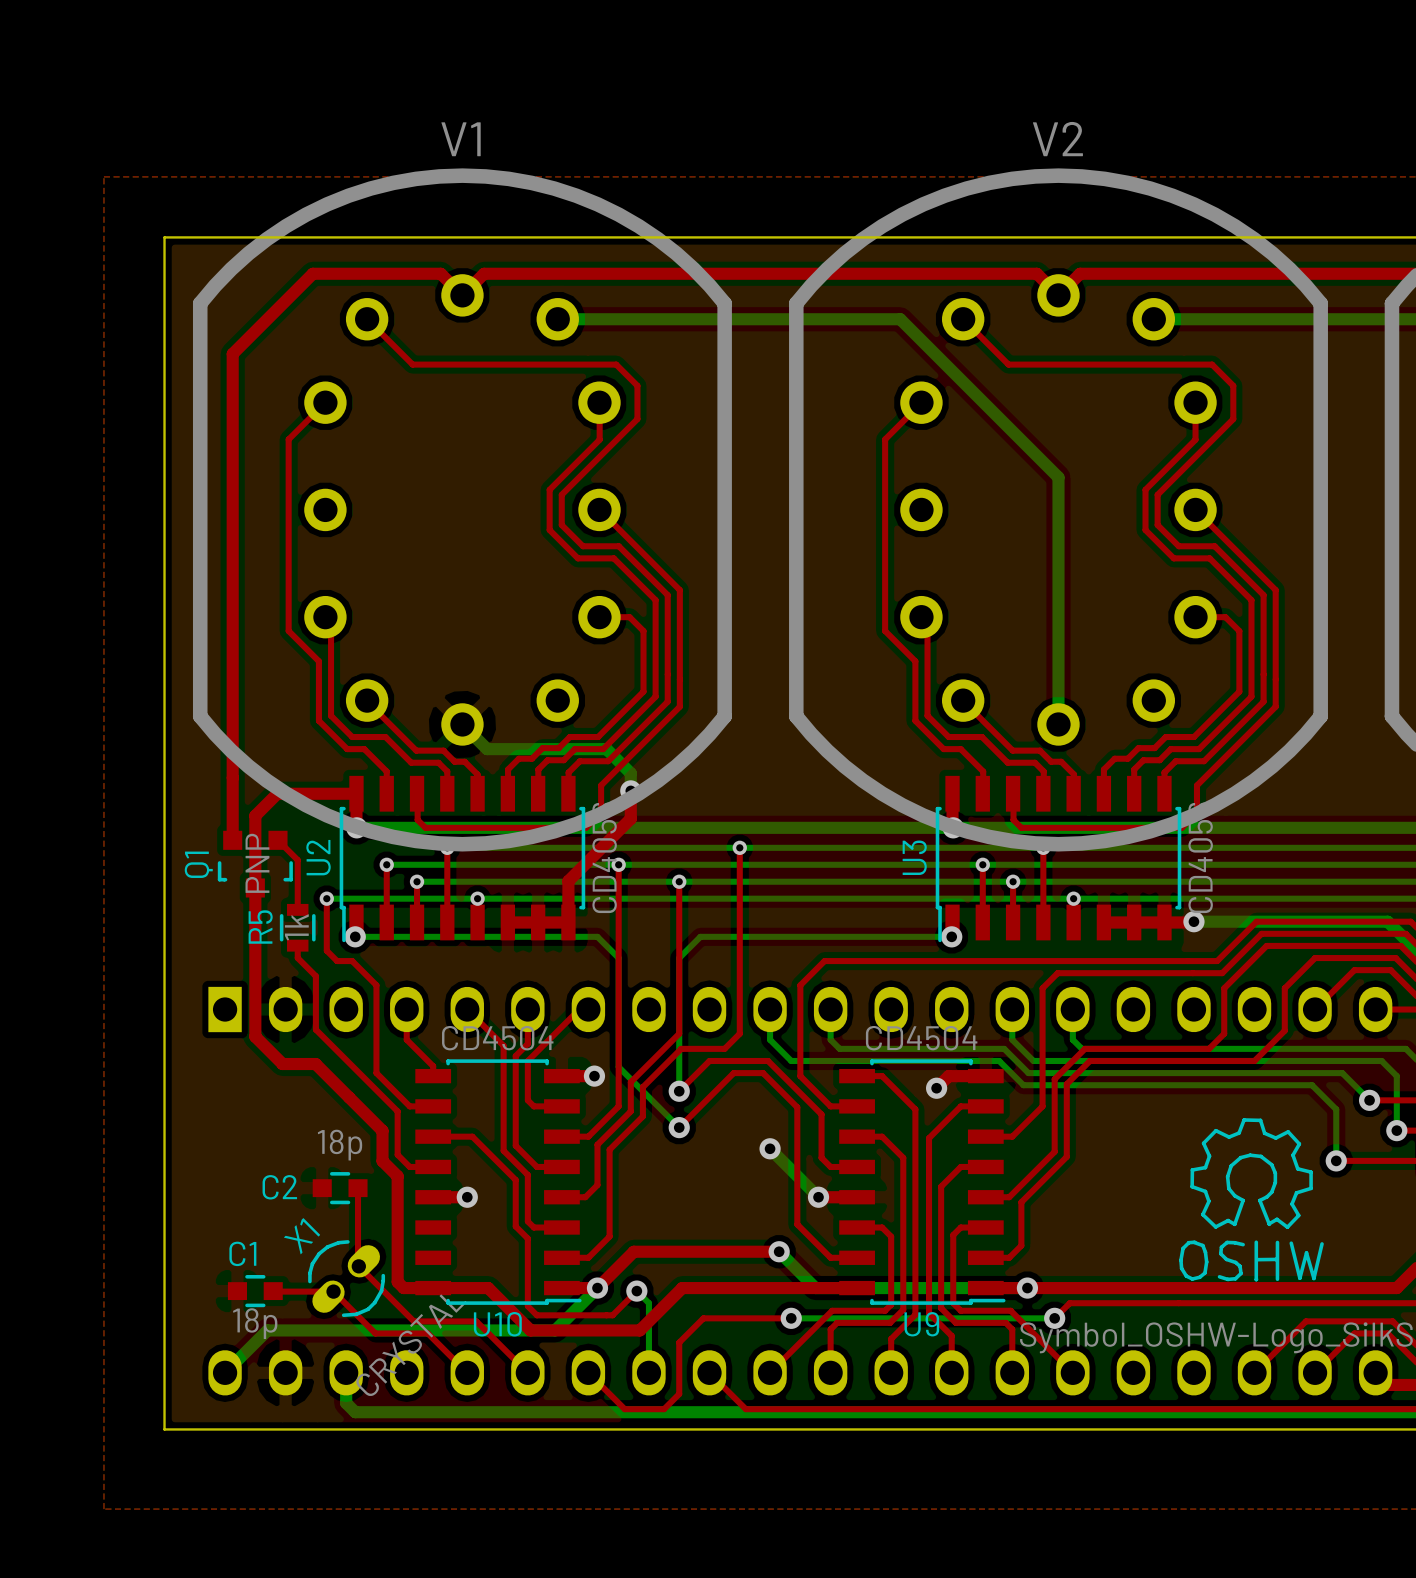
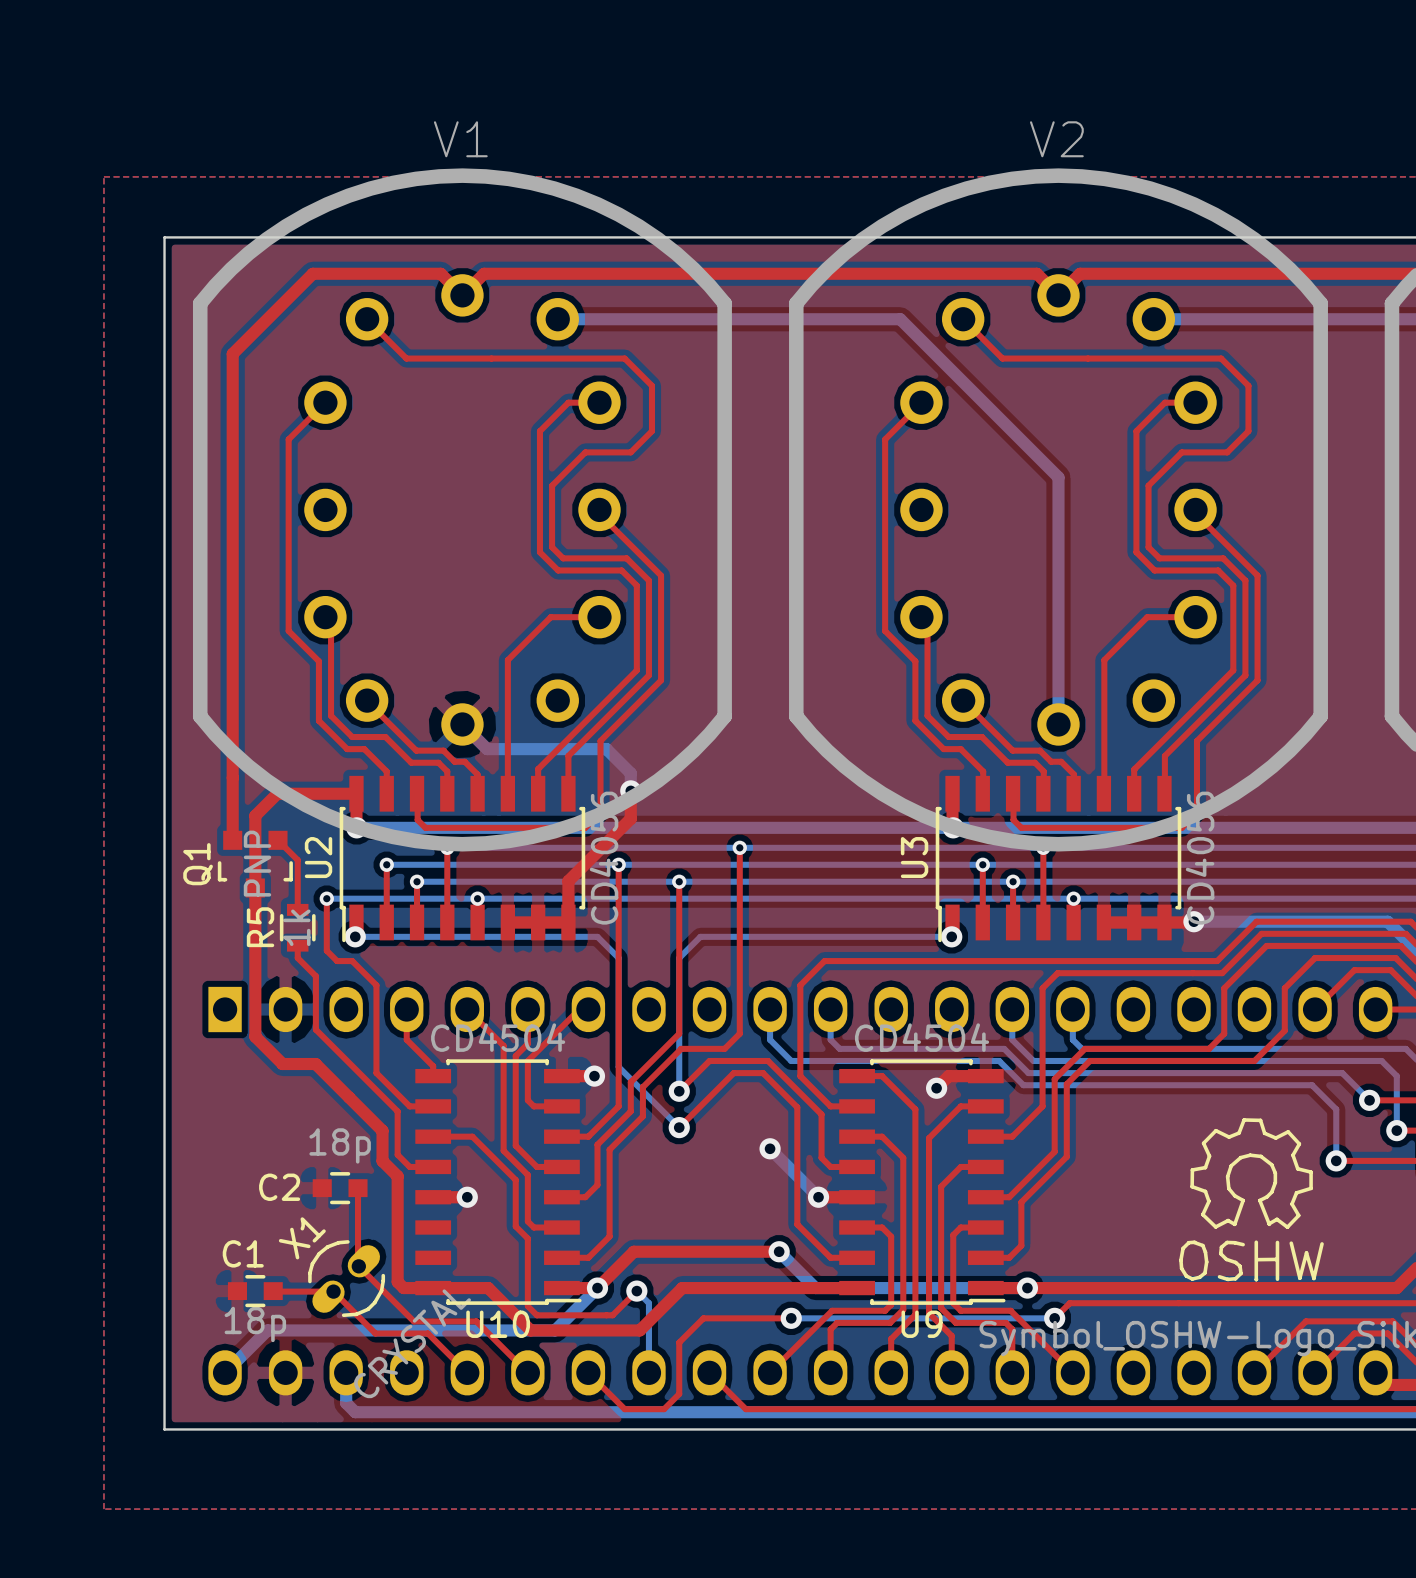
top track: (367, 319) (412, 364) (616, 364) (637, 385) (637, 419) (561, 494) (561, 525) (582, 546) (618, 546) (667, 595) (667, 701) (608, 761) (579, 761) (568, 772) (568, 793) -> (367, 319) (406, 358) (624, 358) (651, 385) (651, 431) (630, 452) (585, 452) (552, 485) (552, 547) (563, 558) (577, 558)
top track: (1002, 358) (1008, 364) (1212, 364) (1233, 385) (1233, 419) (1157, 494) (1157, 525) (1178, 546) (1214, 546) (1263, 595) (1263, 701) (1204, 761) (1175, 761) (1164, 772) (1164, 793) -> none
top track: (599, 402) (599, 439) (549, 489) (549, 530) (577, 558) -> (599, 402) (568, 402) (539, 431) (539, 552) (558, 570) (621, 570) (636, 585) (636, 670) (538, 769) (538, 793)
top track: (1195, 402) (1195, 439) (1145, 489) (1145, 530) (1173, 558) -> (1002, 358) (1221, 358) (1248, 385) (1248, 431) (1227, 452) (1181, 452) (1148, 485) (1148, 547) (1159, 558) (1173, 558)
top track: none -> (1195, 402) (1164, 402) (1136, 431) (1136, 552) (1154, 570) (1218, 570) (1233, 585) (1233, 670) (1143, 760)
top track: (599, 509) (679, 590) (679, 706) (601, 785) (601, 812) (585, 827) -> (599, 514) (661, 575) (661, 680) (600, 740) (600, 812) (585, 827)
top track: (1195, 509) (1275, 590) (1275, 706) (1196, 785) -> (1195, 509) (1195, 514) (1257, 575) (1257, 680) (1196, 740) (1196, 785)
top track: (613, 558) (655, 600) (655, 696) (603, 749) (574, 749) (563, 760) (547, 760) (538, 769) (538, 793) -> (613, 558) (626, 558) (648, 580) (648, 675) (568, 755) (568, 793)
top track: (1209, 558) (1251, 600) (1251, 696) (1199, 749) (1170, 749) (1159, 760) (1143, 760) -> (1209, 558) (1223, 558) (1245, 580) (1245, 675) (1164, 755) (1164, 793)
top track: (599, 617) (629, 617) (643, 631) (643, 691) (598, 737) (569, 737) (558, 748) (542, 748) (532, 758) (518, 758) (508, 769) (508, 793) -> (599, 617) (550, 617) (507, 660) (507, 793)
top track: (1195, 617) (1225, 617) (1239, 631) (1239, 691) (1194, 737) (1165, 737) (1154, 748) (1138, 748) (1127, 758) (1114, 758) (1103, 769) (1103, 793) -> (1195, 617) (1147, 617) (1104, 660) (1104, 793)

